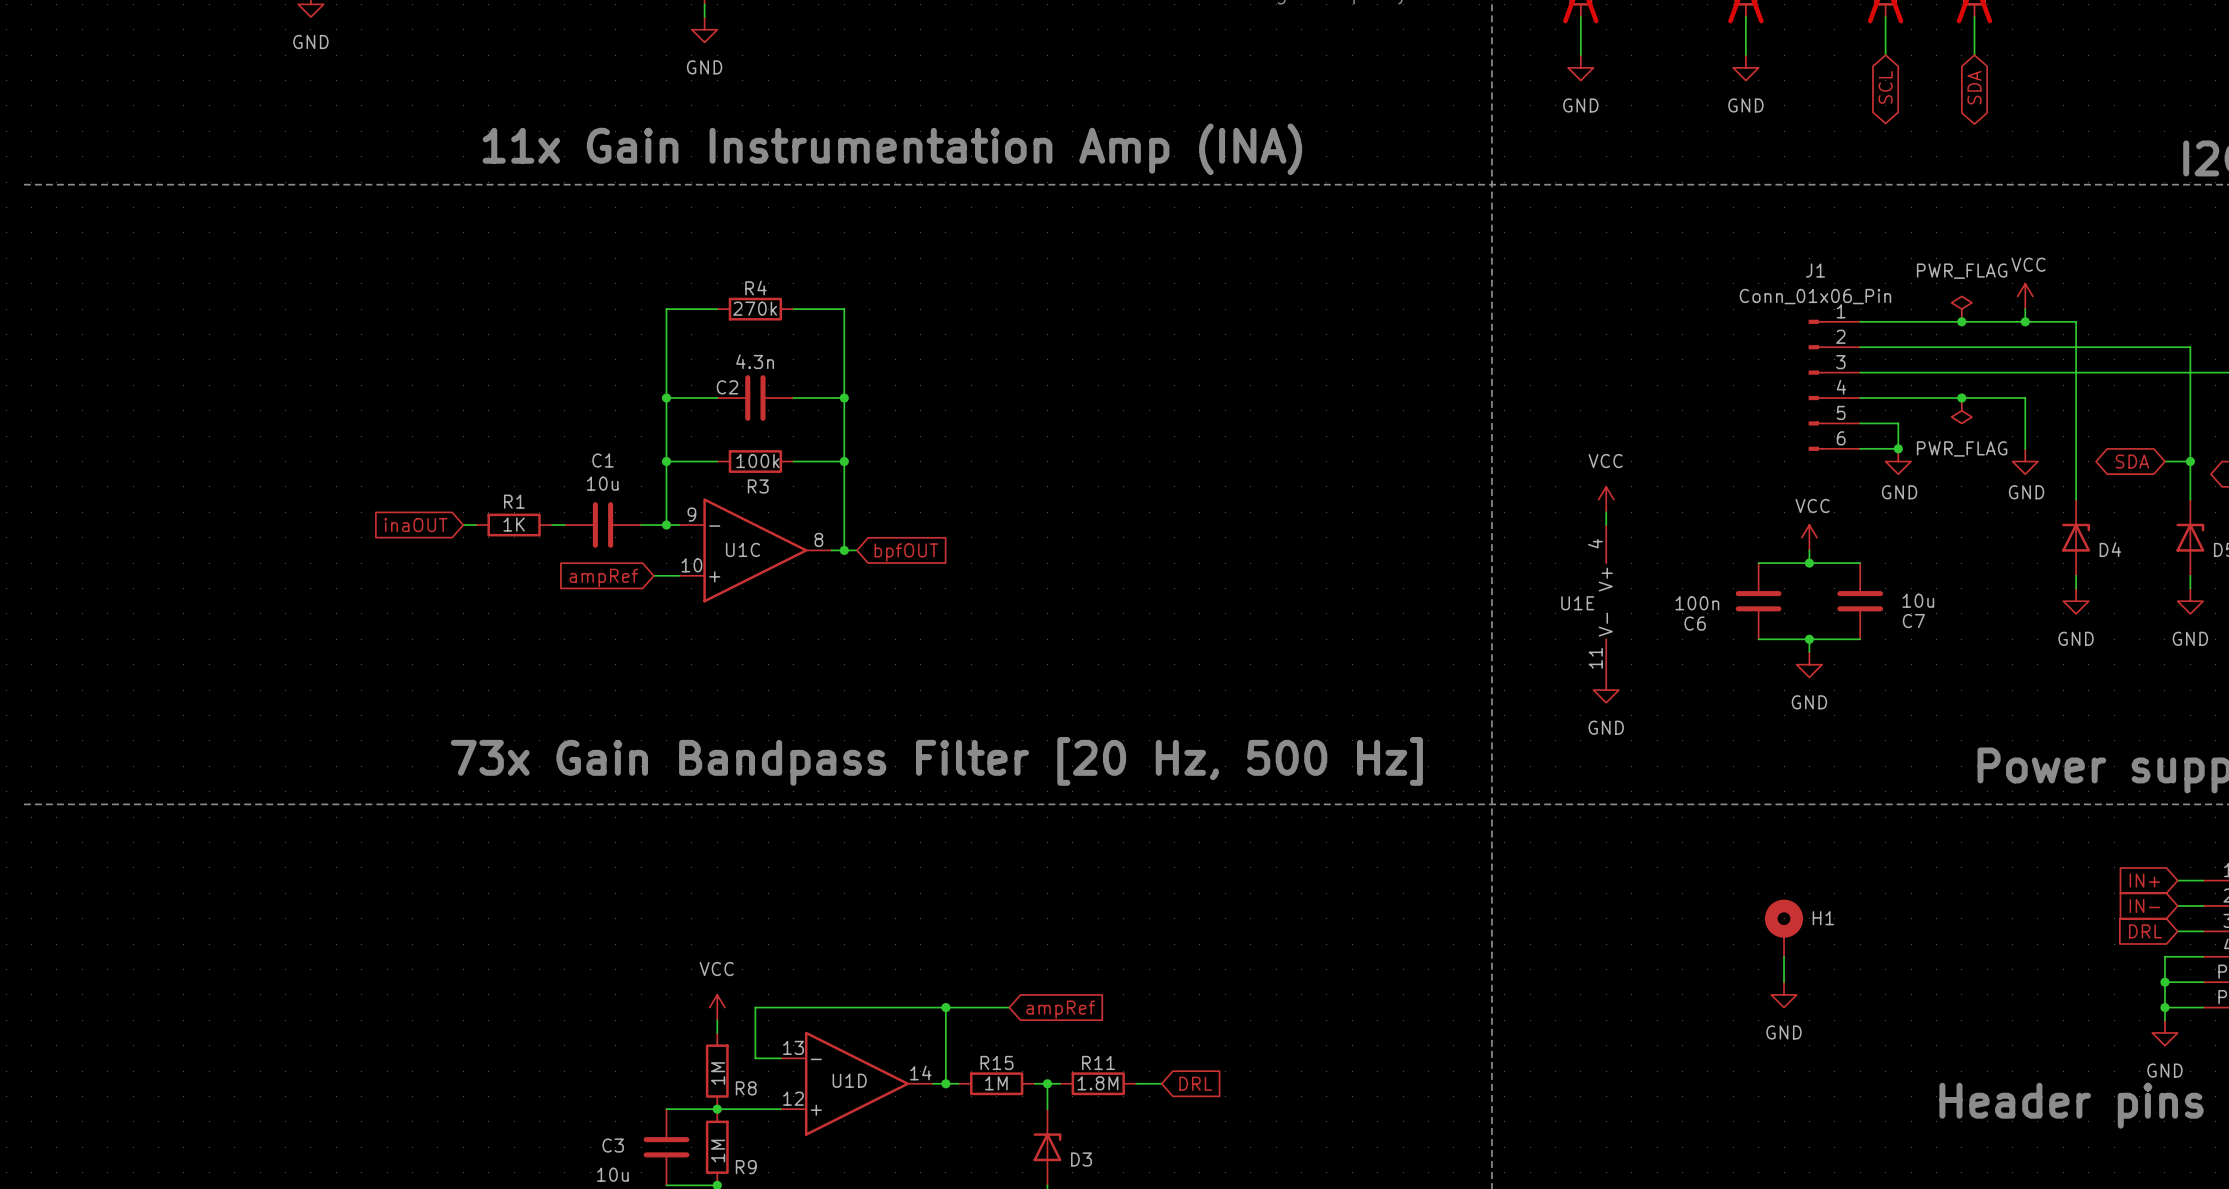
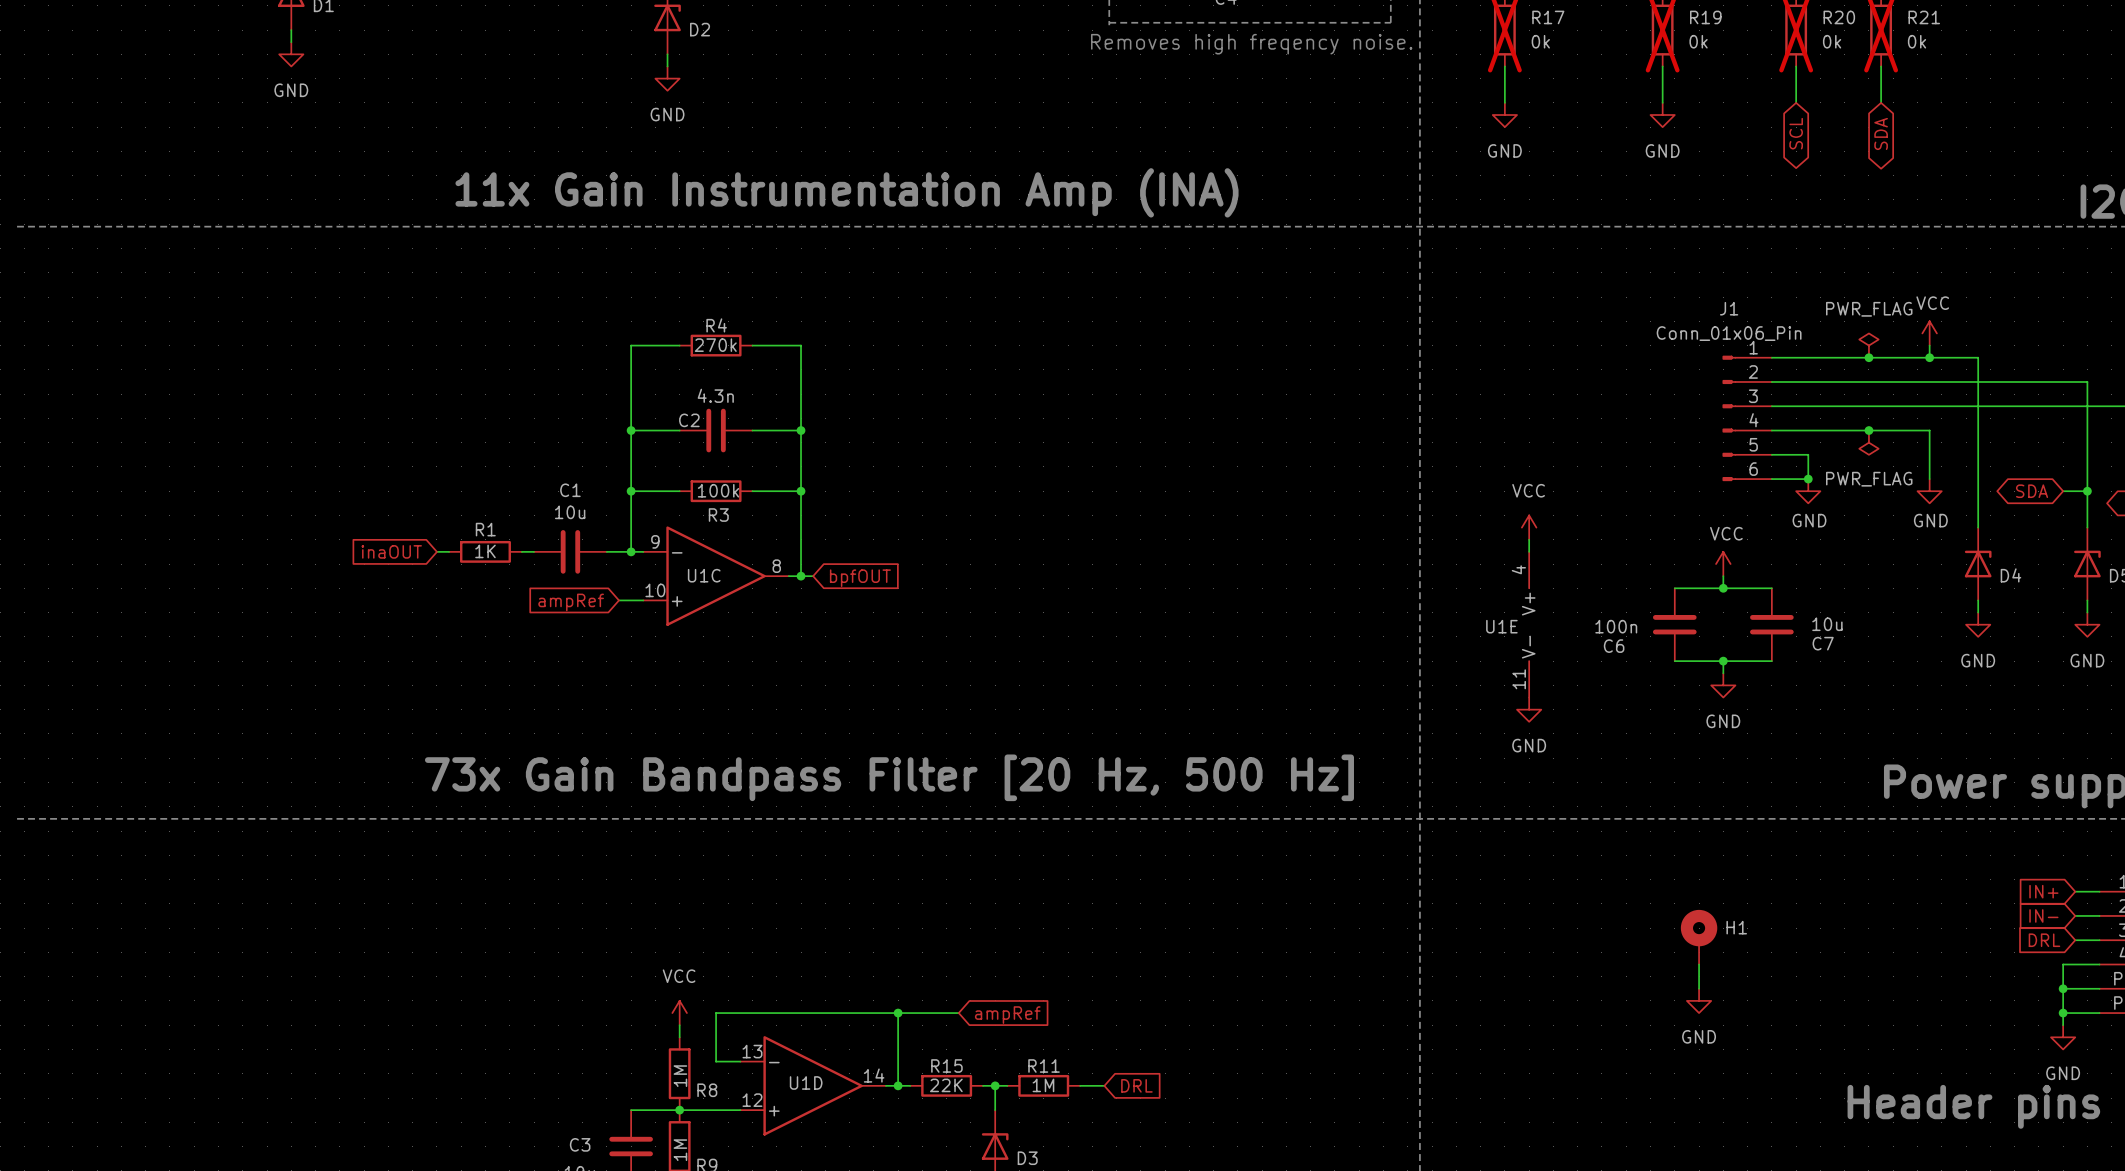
R15 value: 1M (996, 1083) -> 22K (946, 1085)
R11 value: 1.8M (1097, 1083) -> 1M (1043, 1085)

